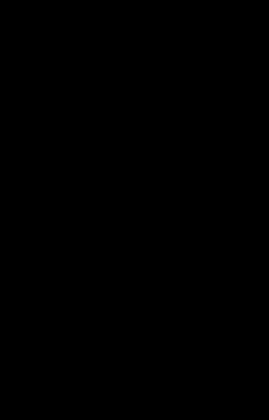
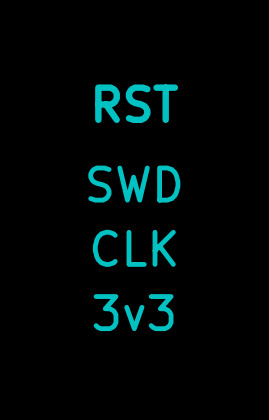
text: none -> RST (136, 103)
text: none -> SWD (134, 184)
text: none -> CLK (134, 248)
text: none -> 3v3 (133, 312)

